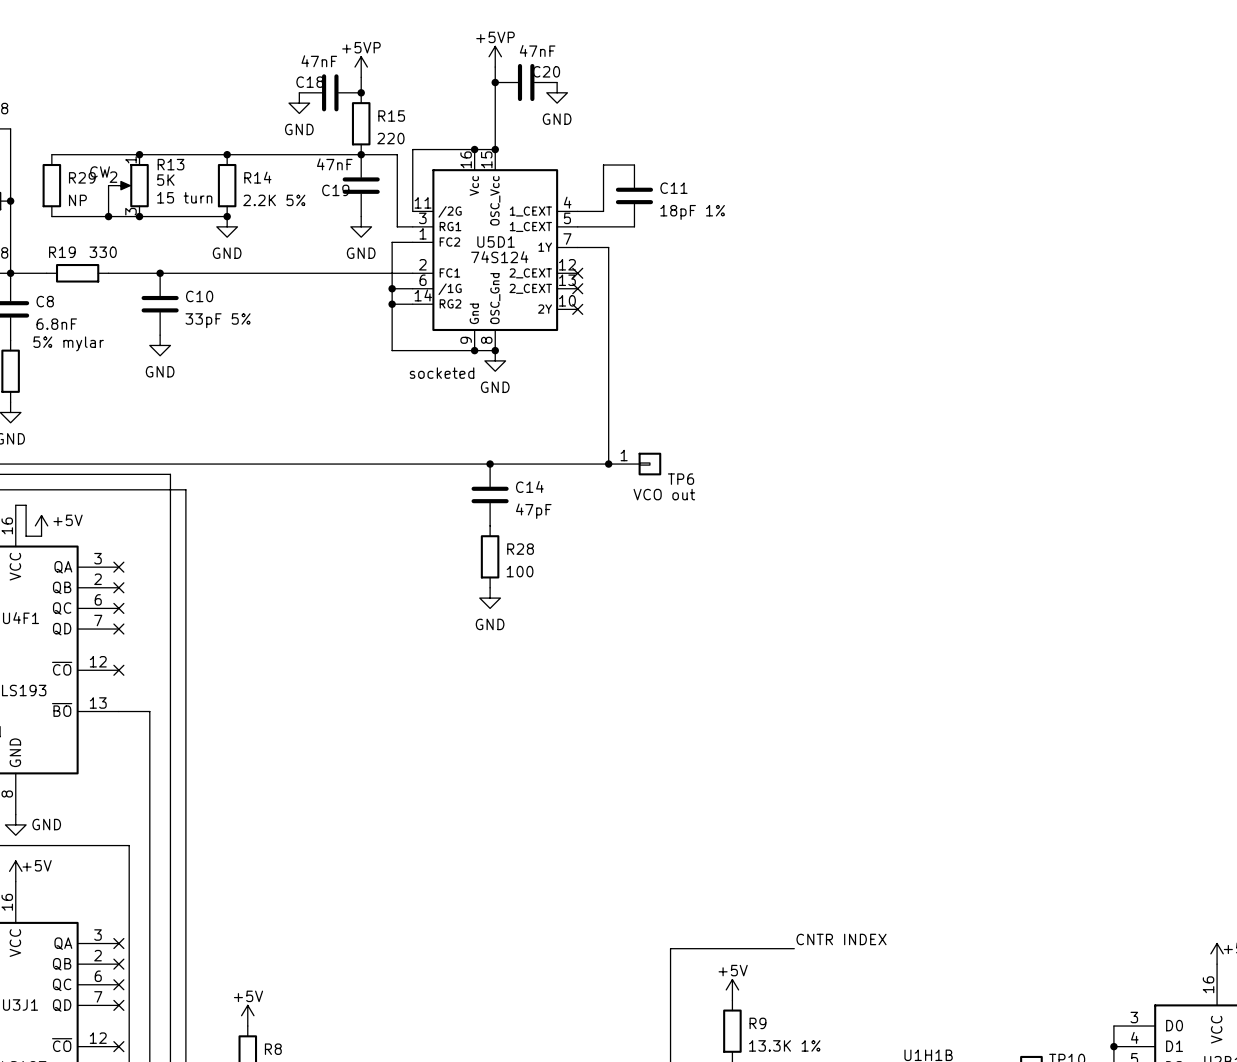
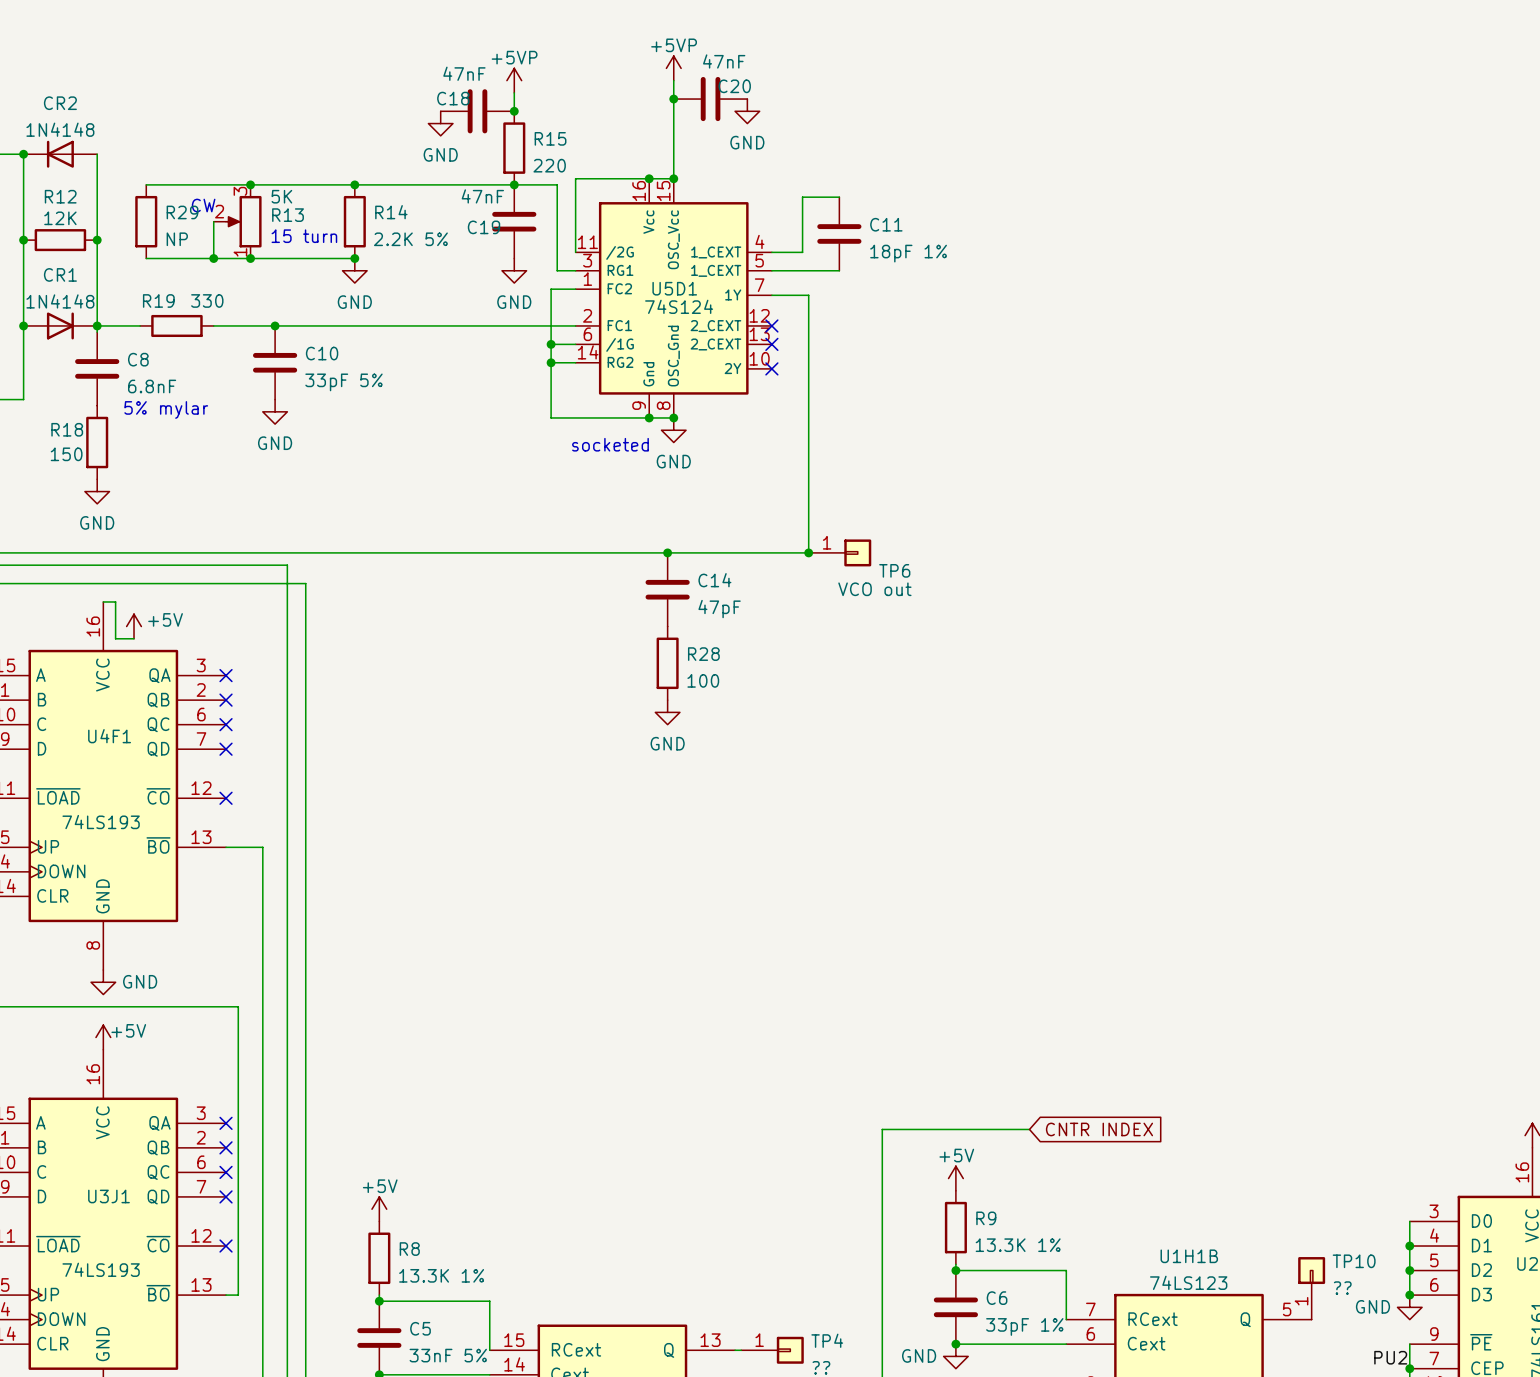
R13 flip: as is (133, 185) -> up-down (243, 221)
label: CNTR INDEX (841, 939) -> none
global label: none -> CNTR INDEX (1099, 1129)

